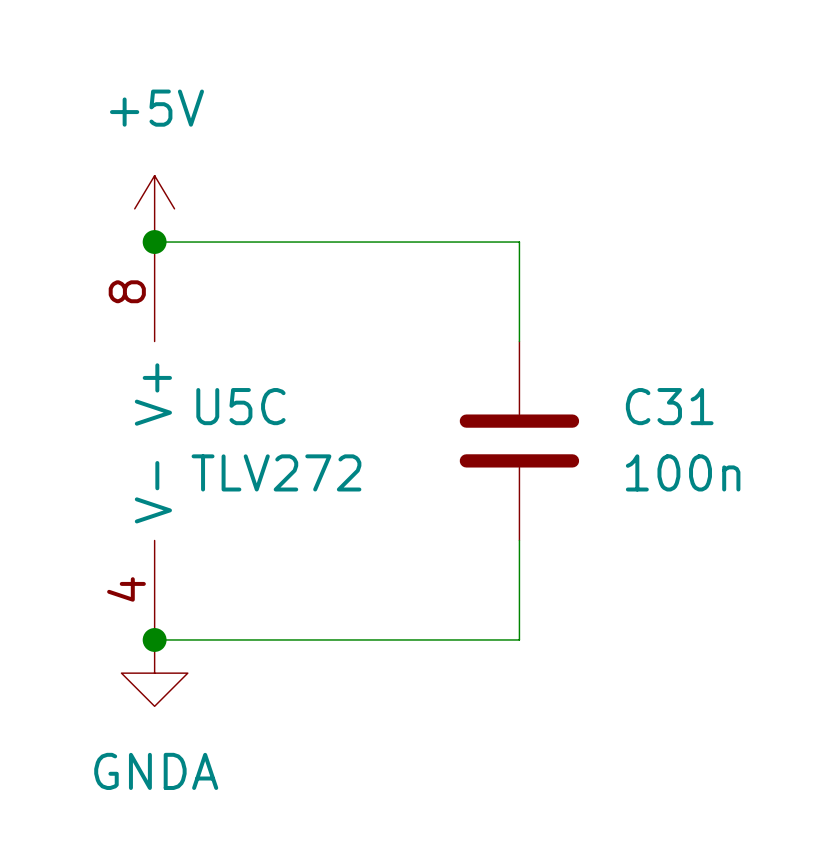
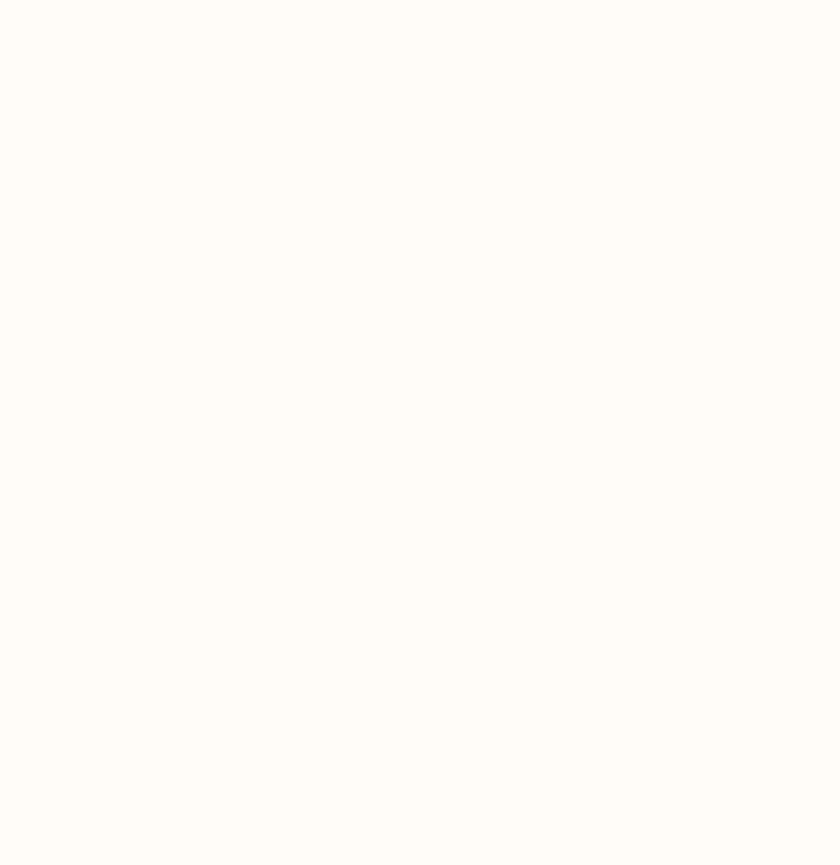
power symbol: +5V (154, 208) -> none
wire: (154, 242) (519, 242) (519, 341) -> none
junction: (154, 242) -> none
U5C: TLV272 (154, 441) -> none
C31: 100n (519, 441) -> none
wire: (519, 540) (519, 639) (154, 639) -> none
junction: (154, 639) -> none
power symbol: GNDA (154, 673) -> none

